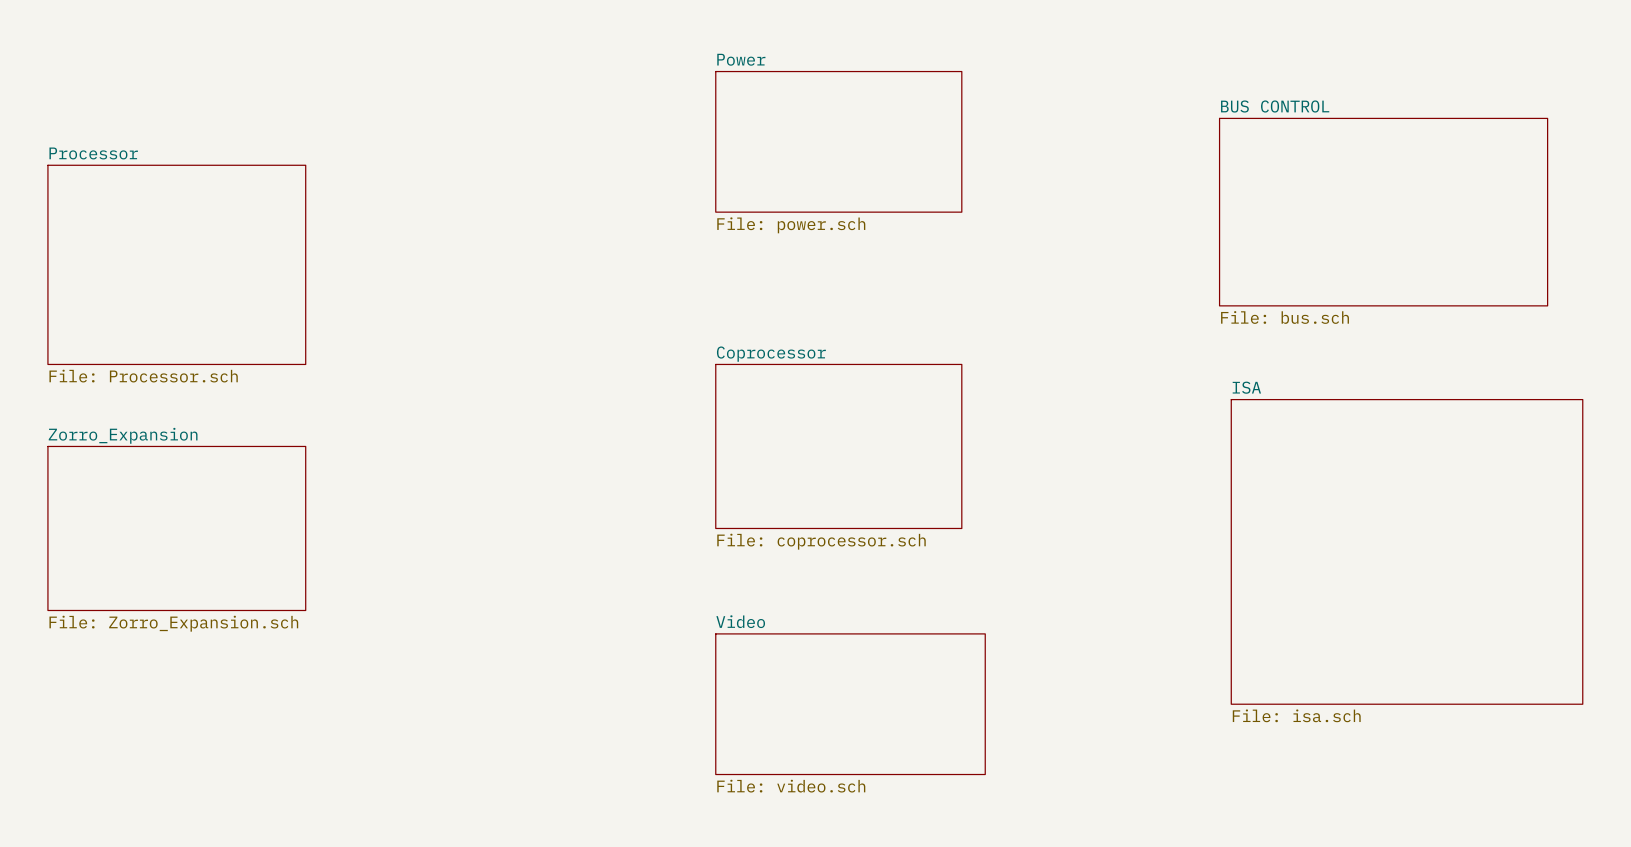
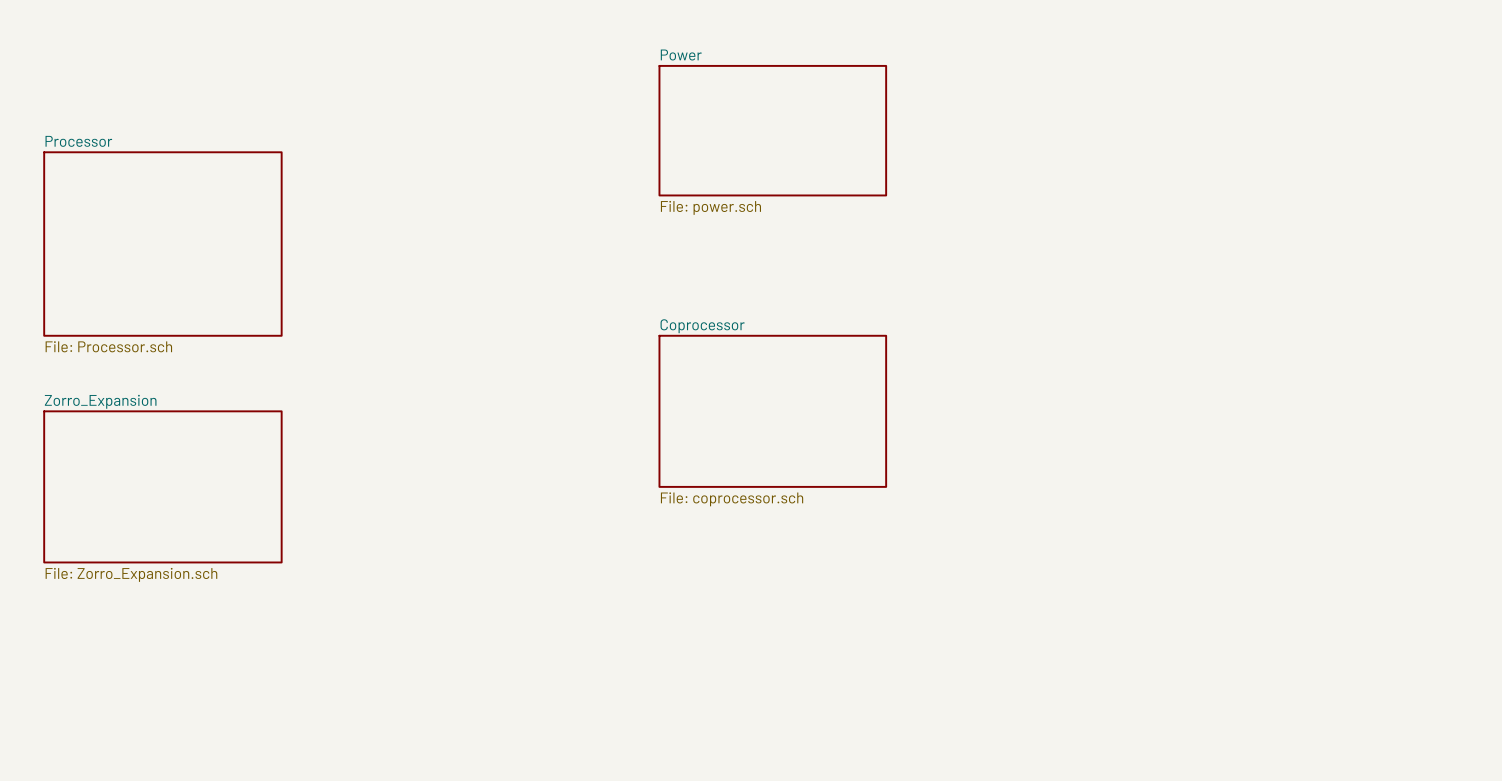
sheet BUS CONTROL: File: bus.sch (1383, 212) -> none
sheet ISA: File: isa.sch (1407, 551) -> none
sheet Video: File: video.sch (850, 704) -> none

